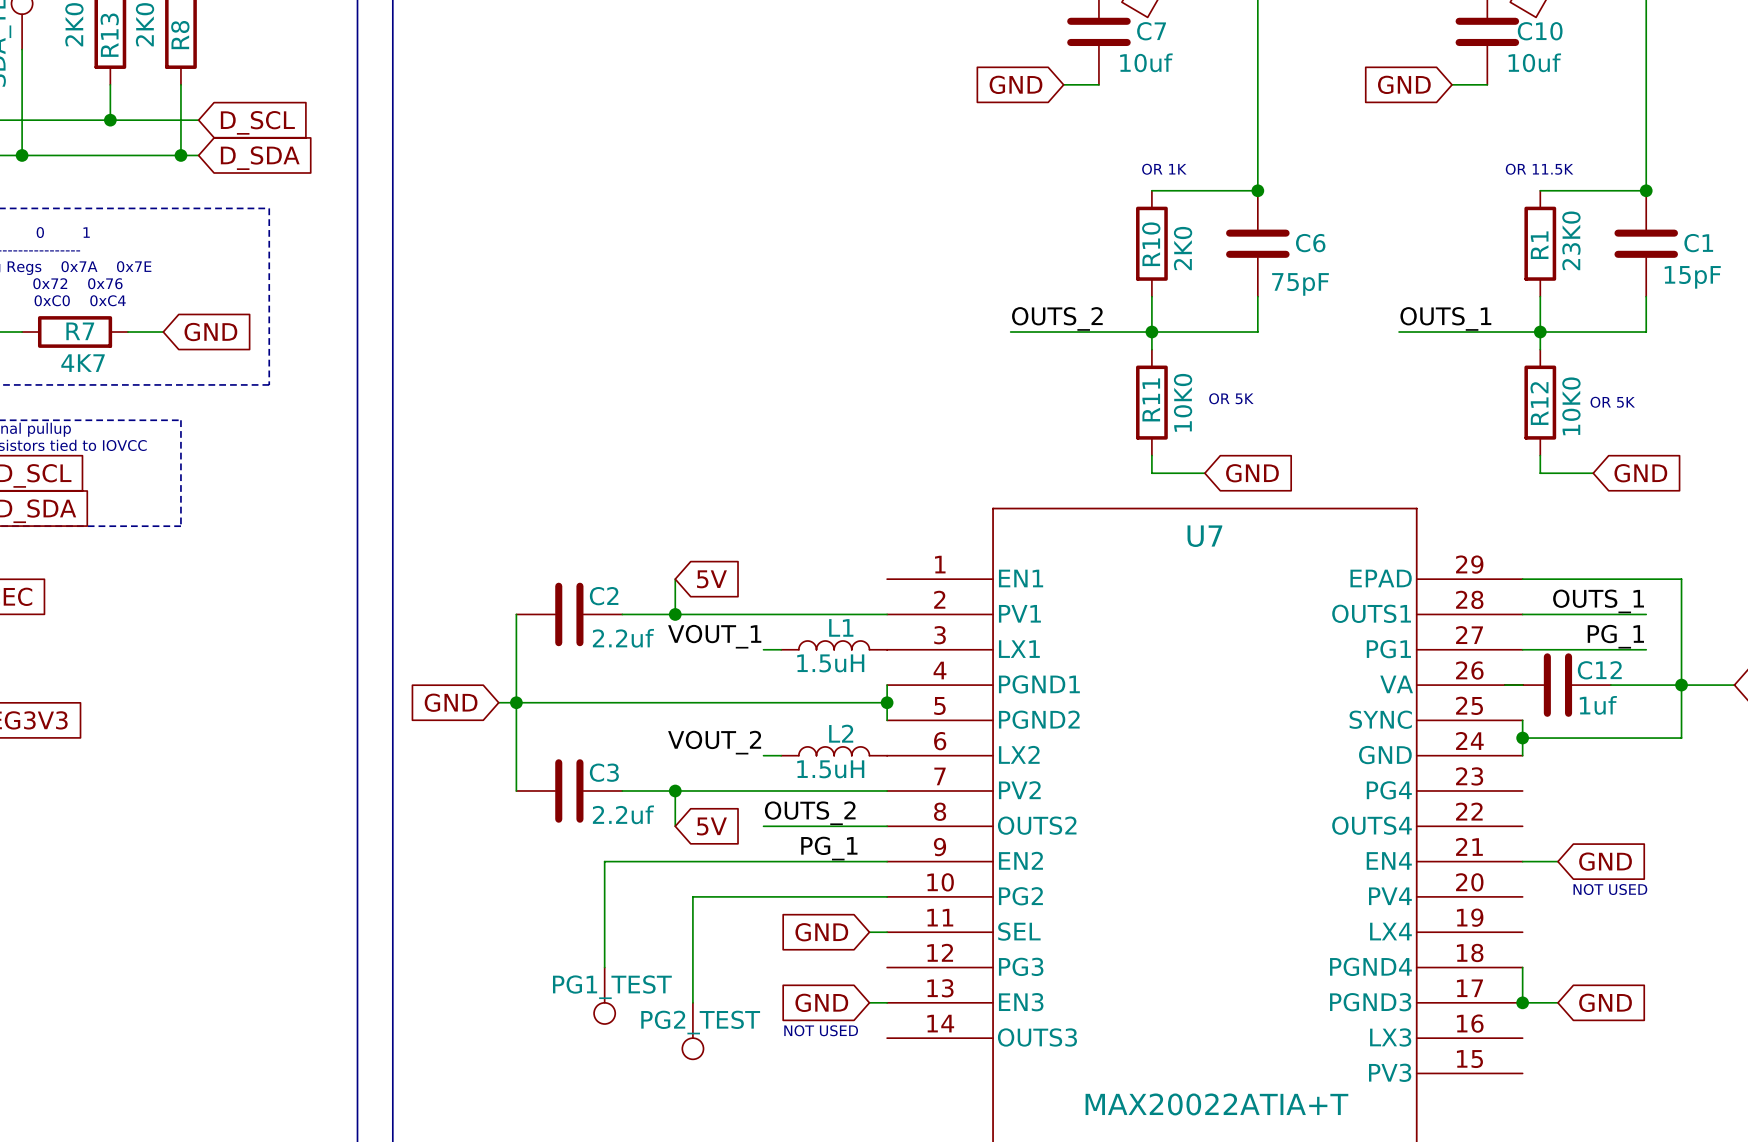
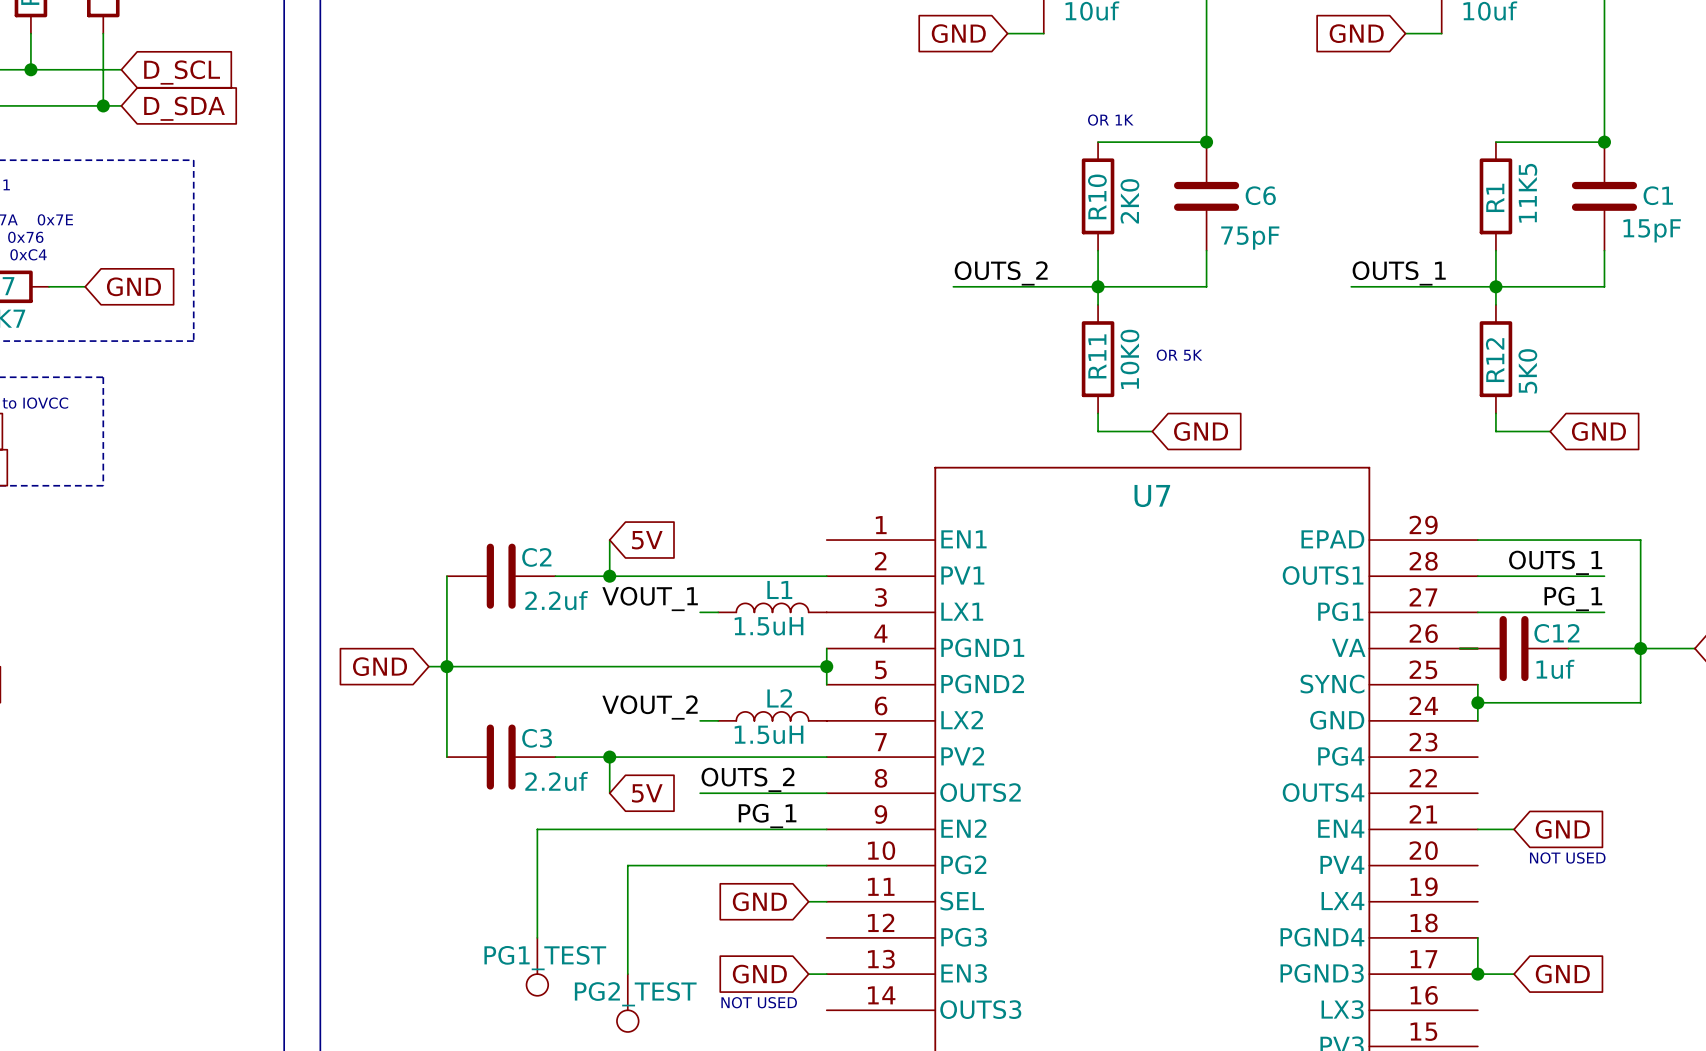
text: OR 11.5K (1539, 169) -> none
R1 value: 23K0 (1571, 240) -> 11K5 (1528, 193)
text: OR 5K (1612, 402) -> none
R12 value: 10K0 (1571, 406) -> 5K0 (1527, 371)

